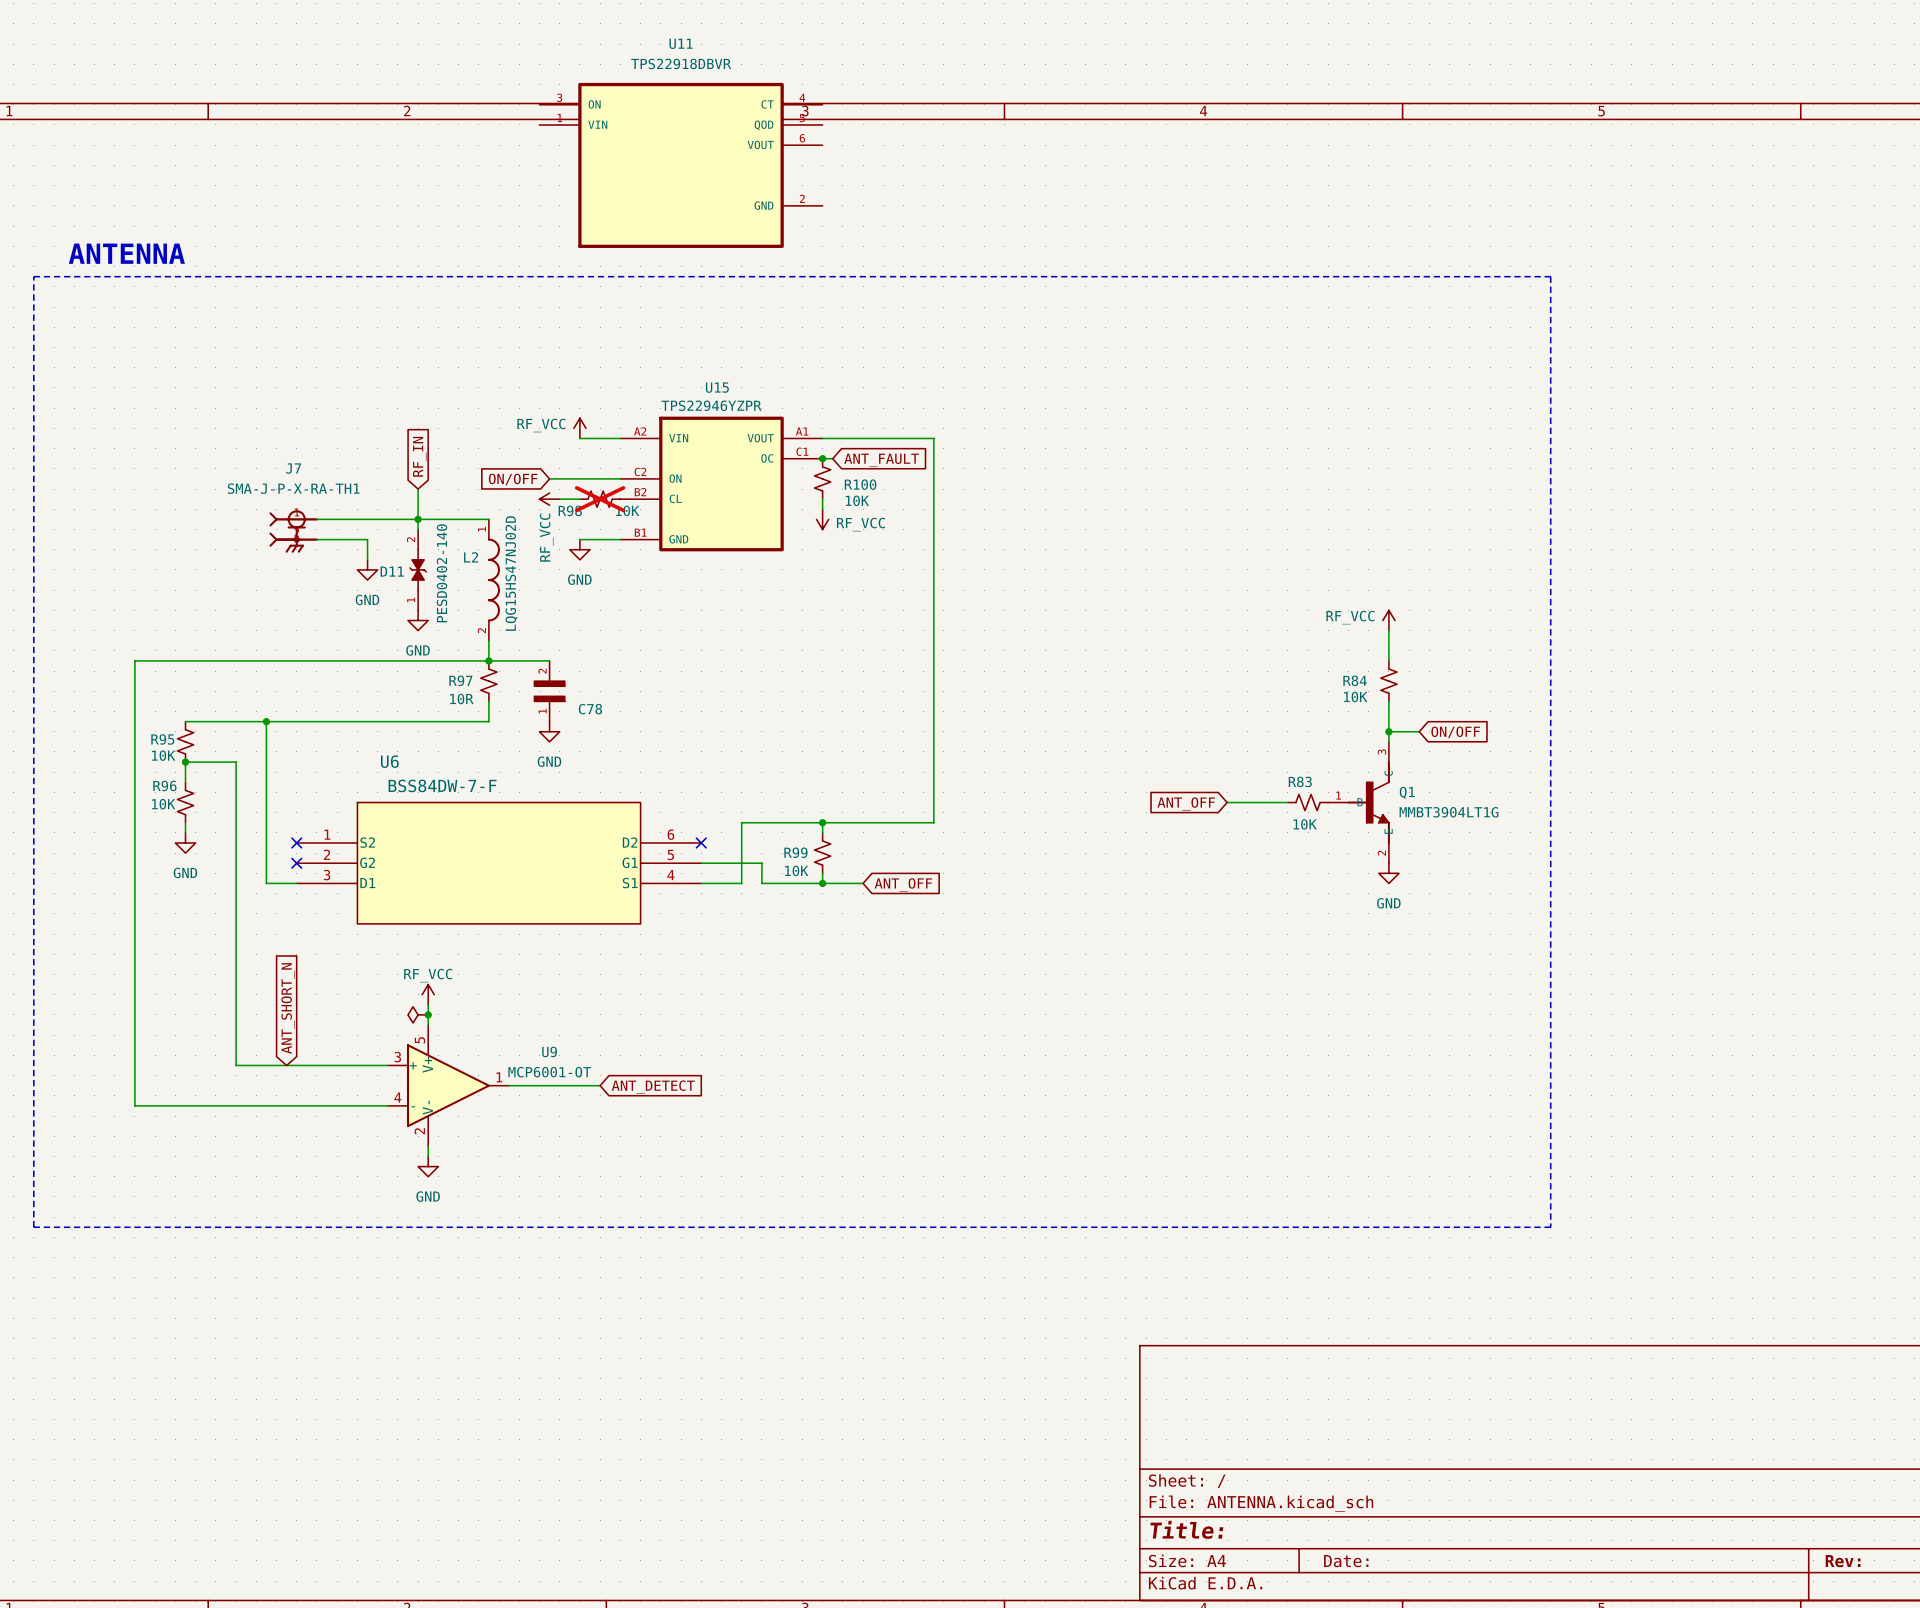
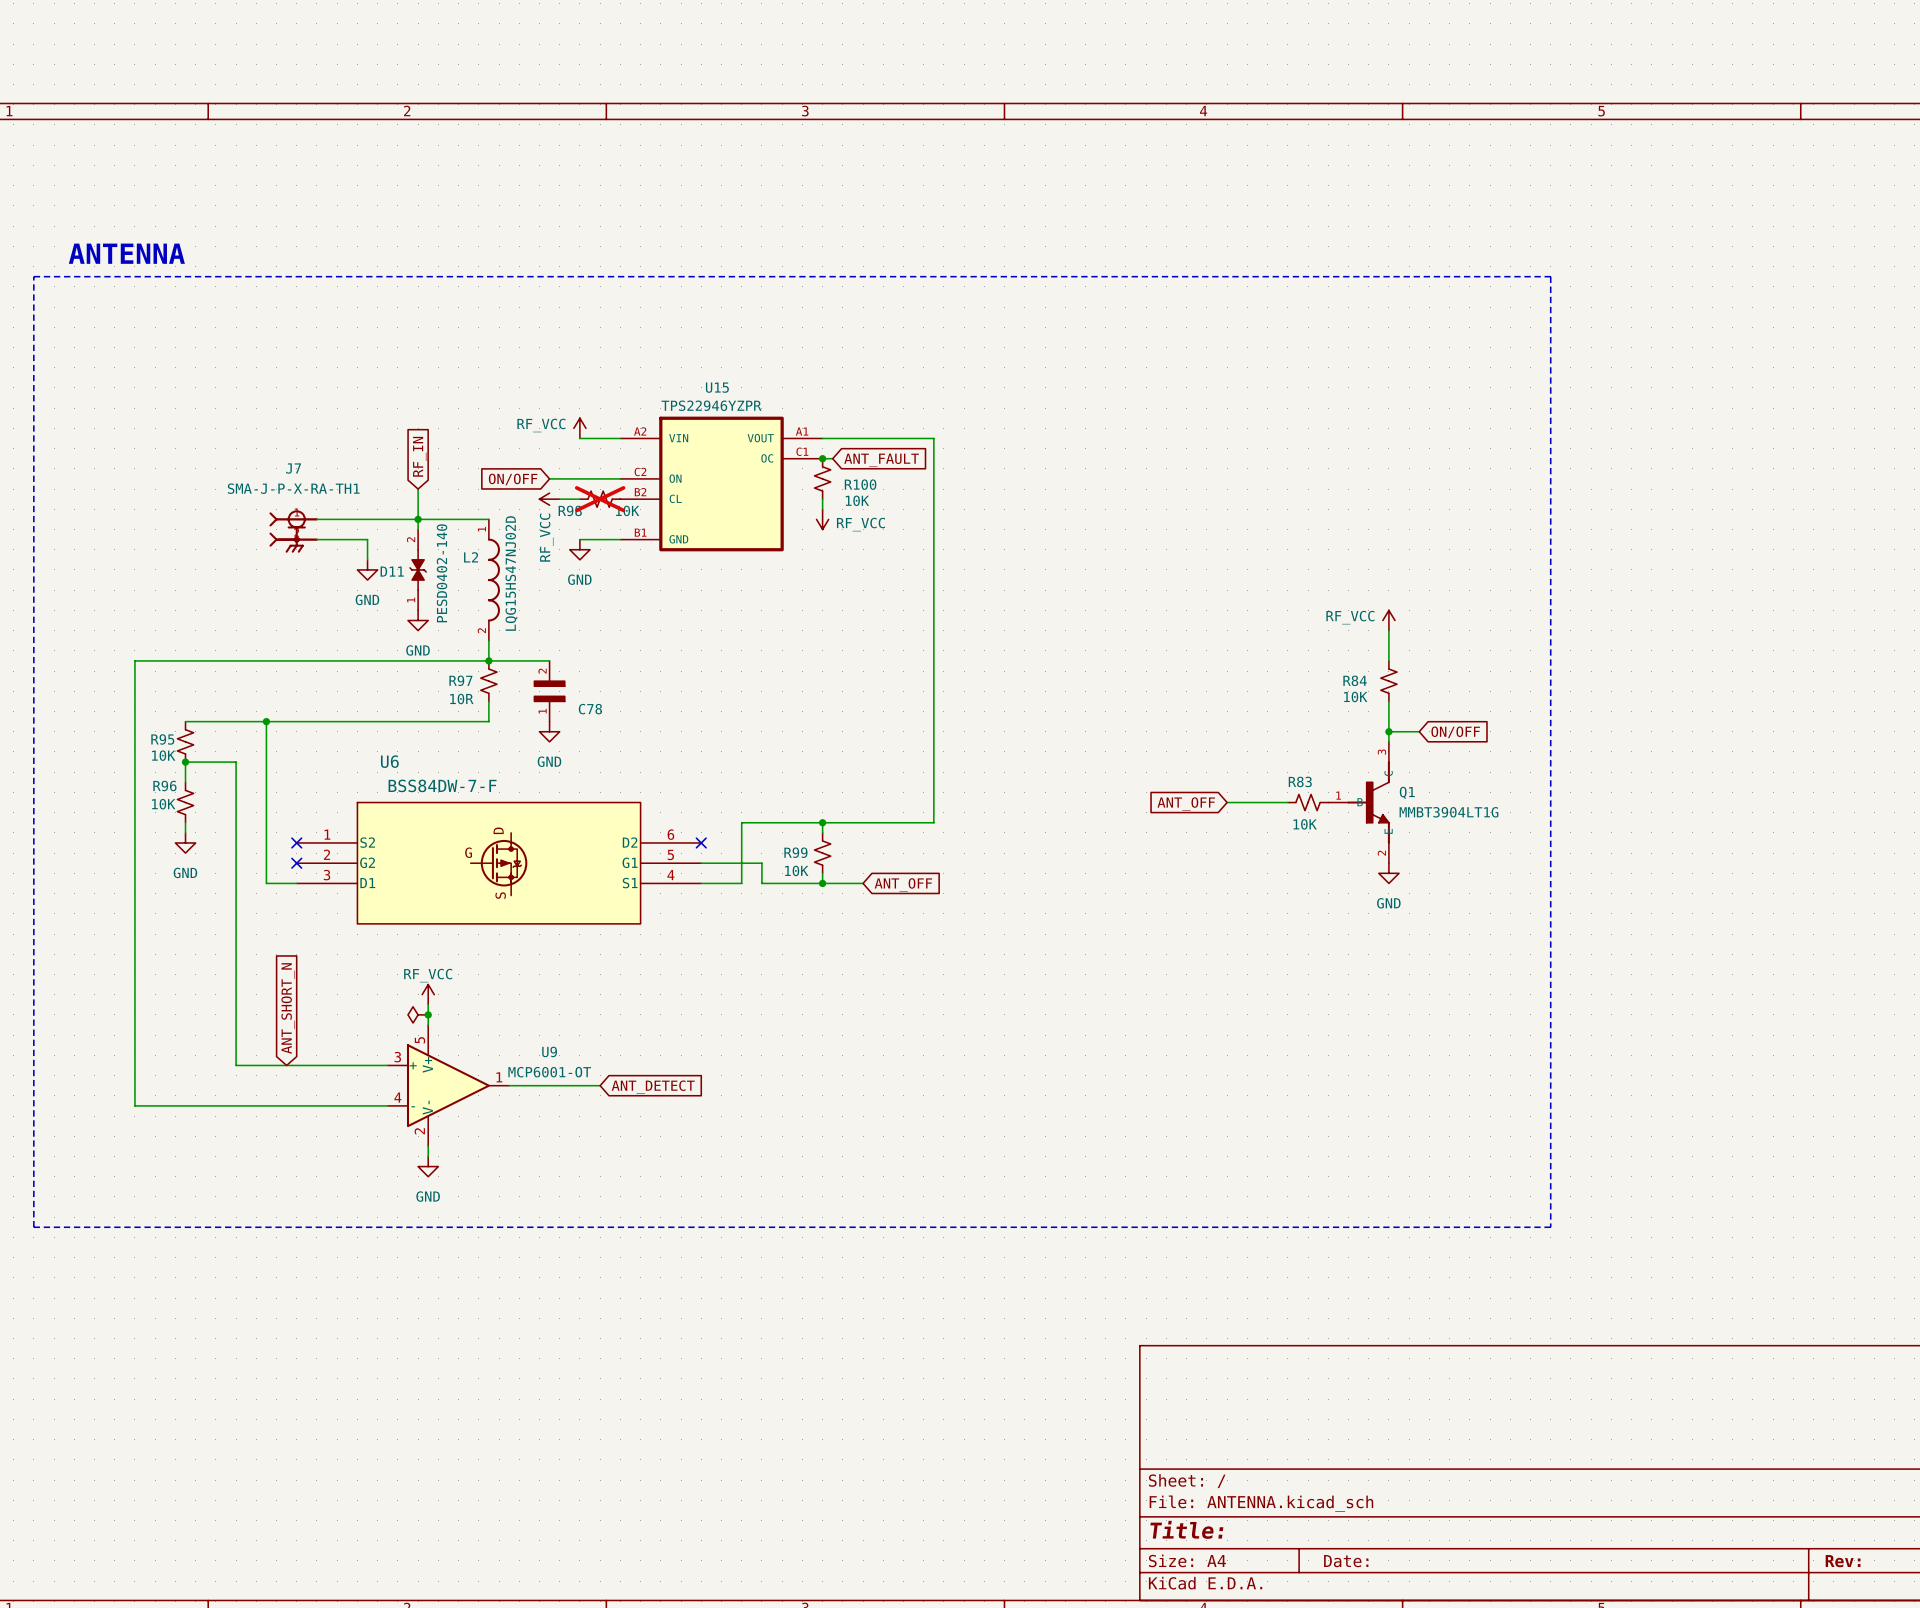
U11: TPS22918DBVR (681, 165) -> none
U6 symbol: [296, 802, 702, 924] -> [296, 802, 702, 924]

